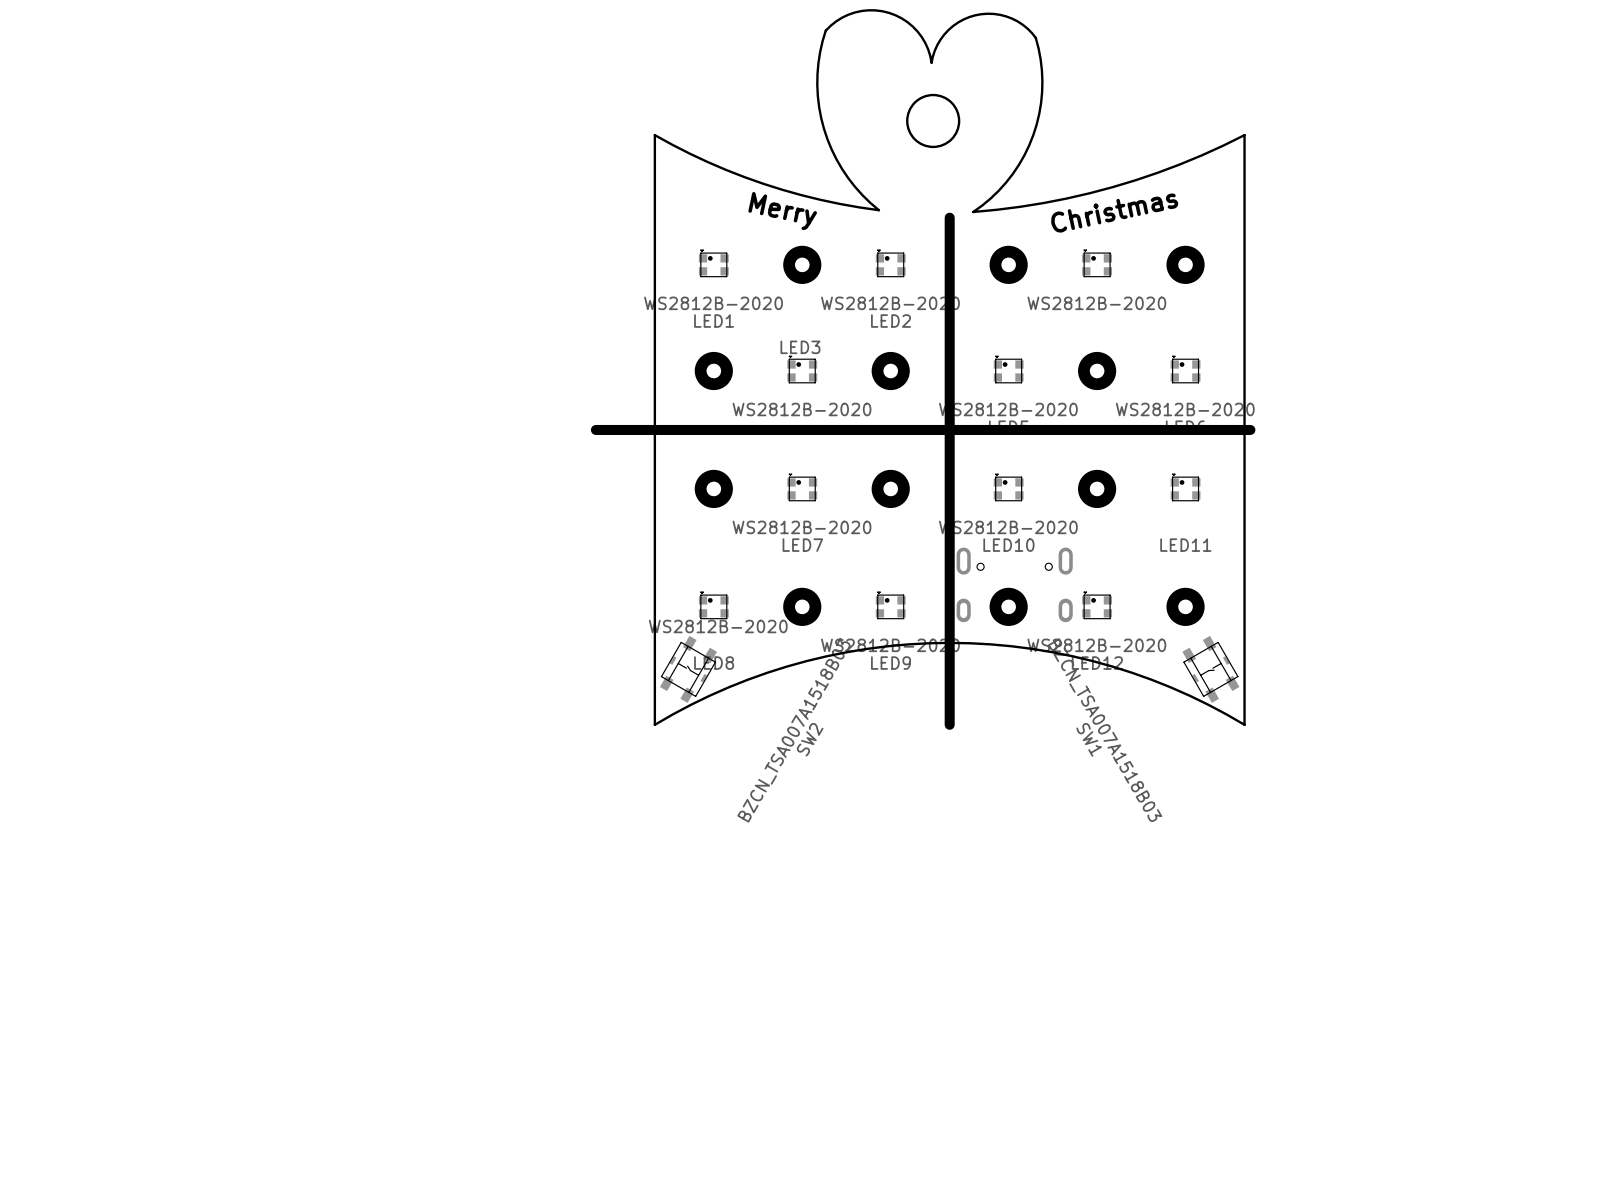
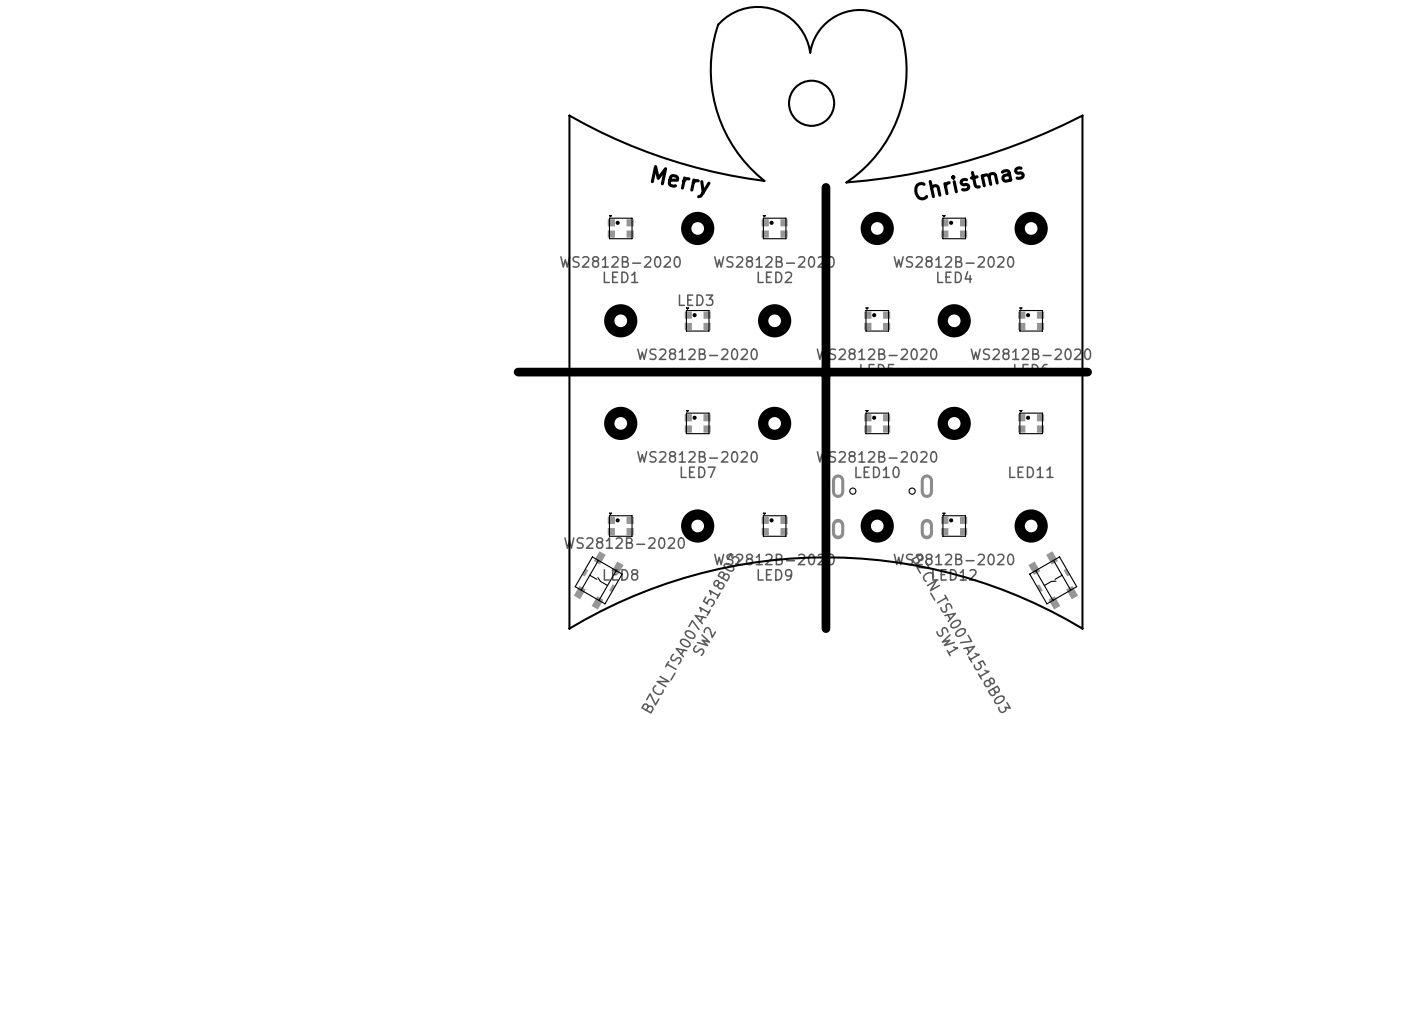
LED4 name: none -> LED4 (954, 277)

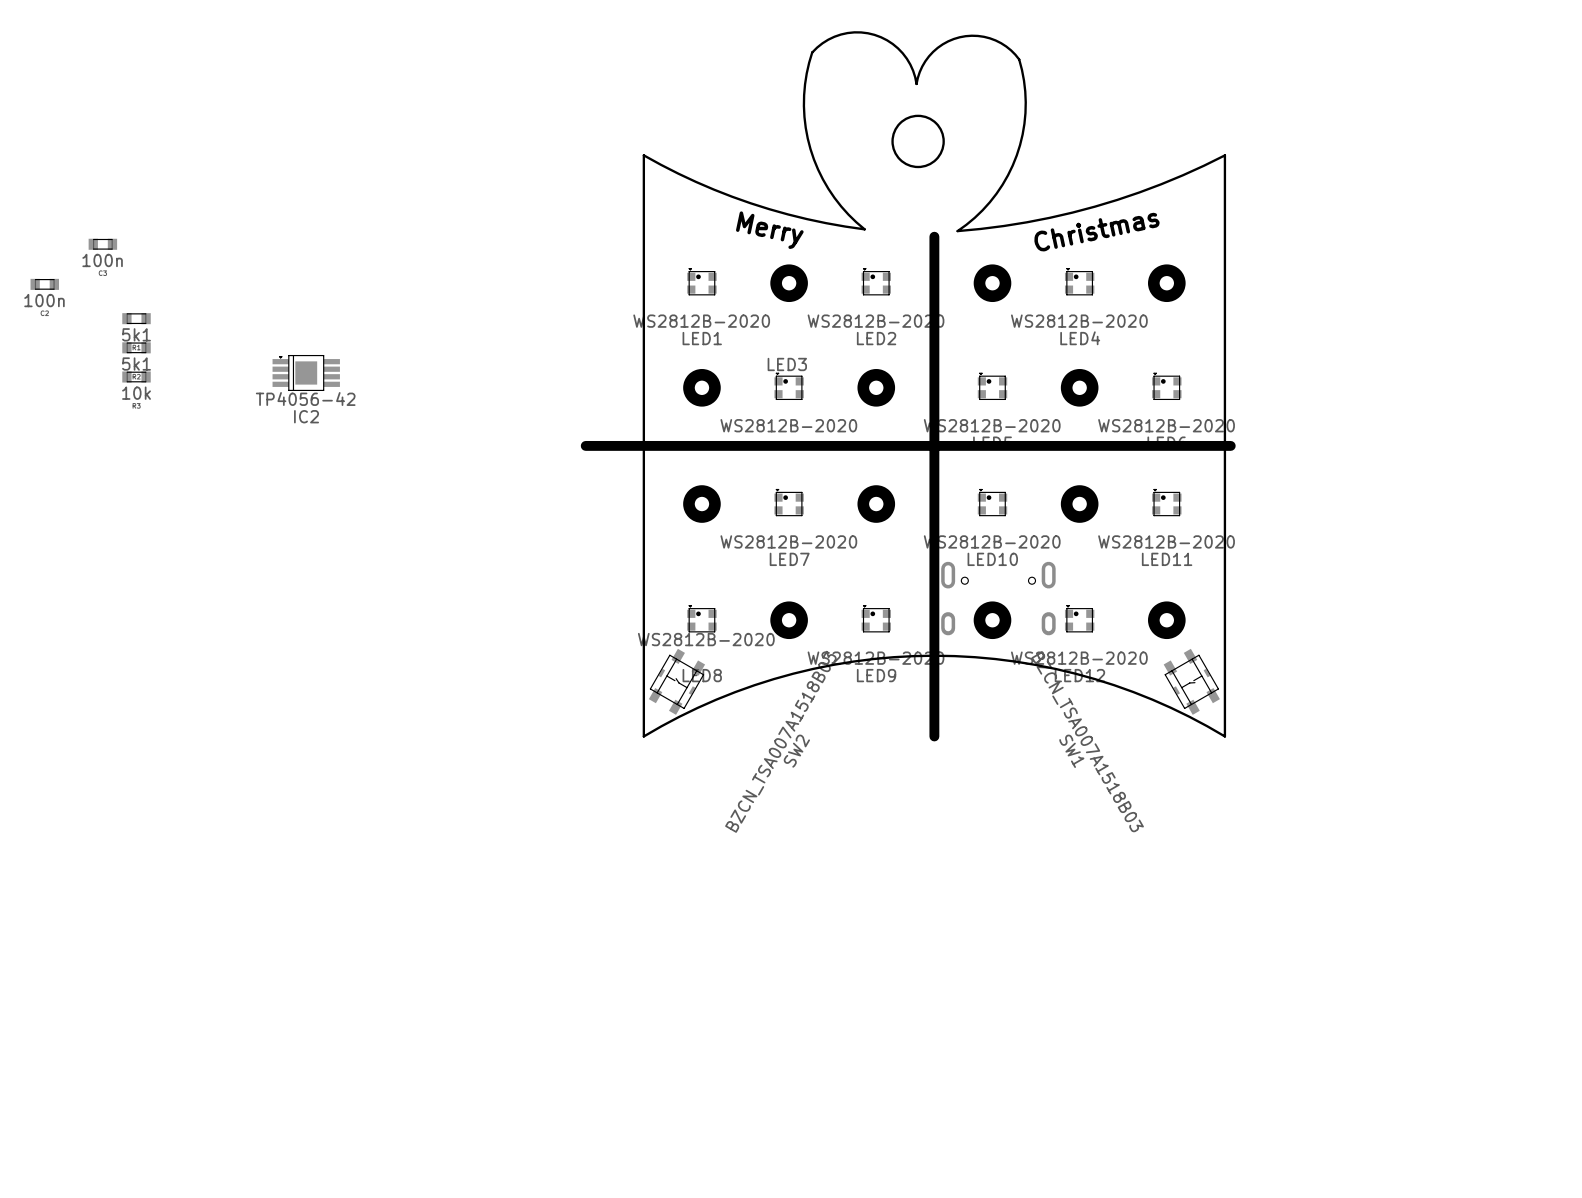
part: none -> 100n (102, 244)
part: none -> 100n (44, 284)
part: none -> 5k1 (136, 318)
part: none -> 5k1 (136, 347)
IC2: none -> TP4056-42 (306, 372)
part: none -> 10k (136, 377)
LED11 value: none -> WS2812B-2020 (1166, 541)

